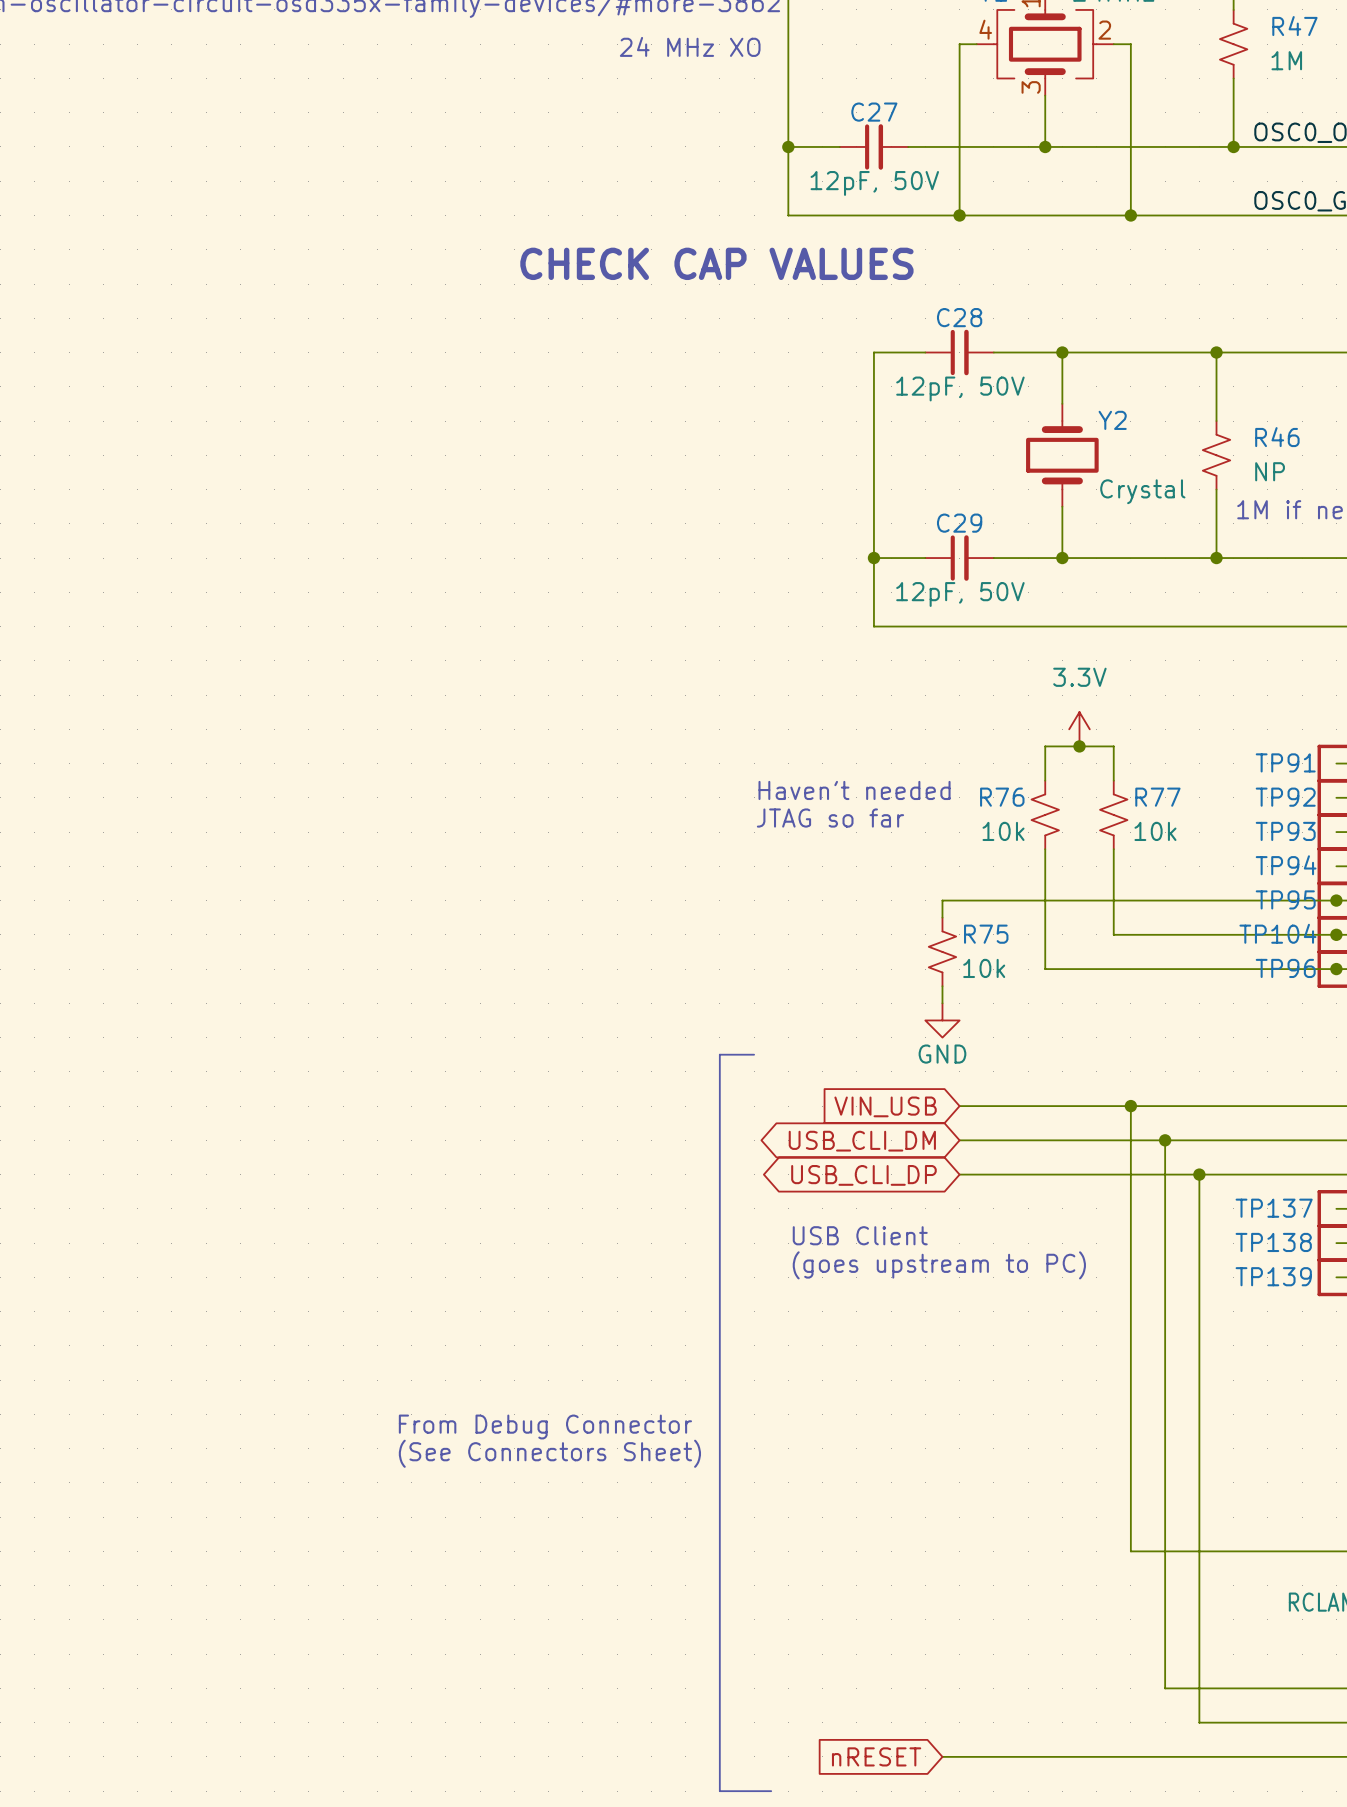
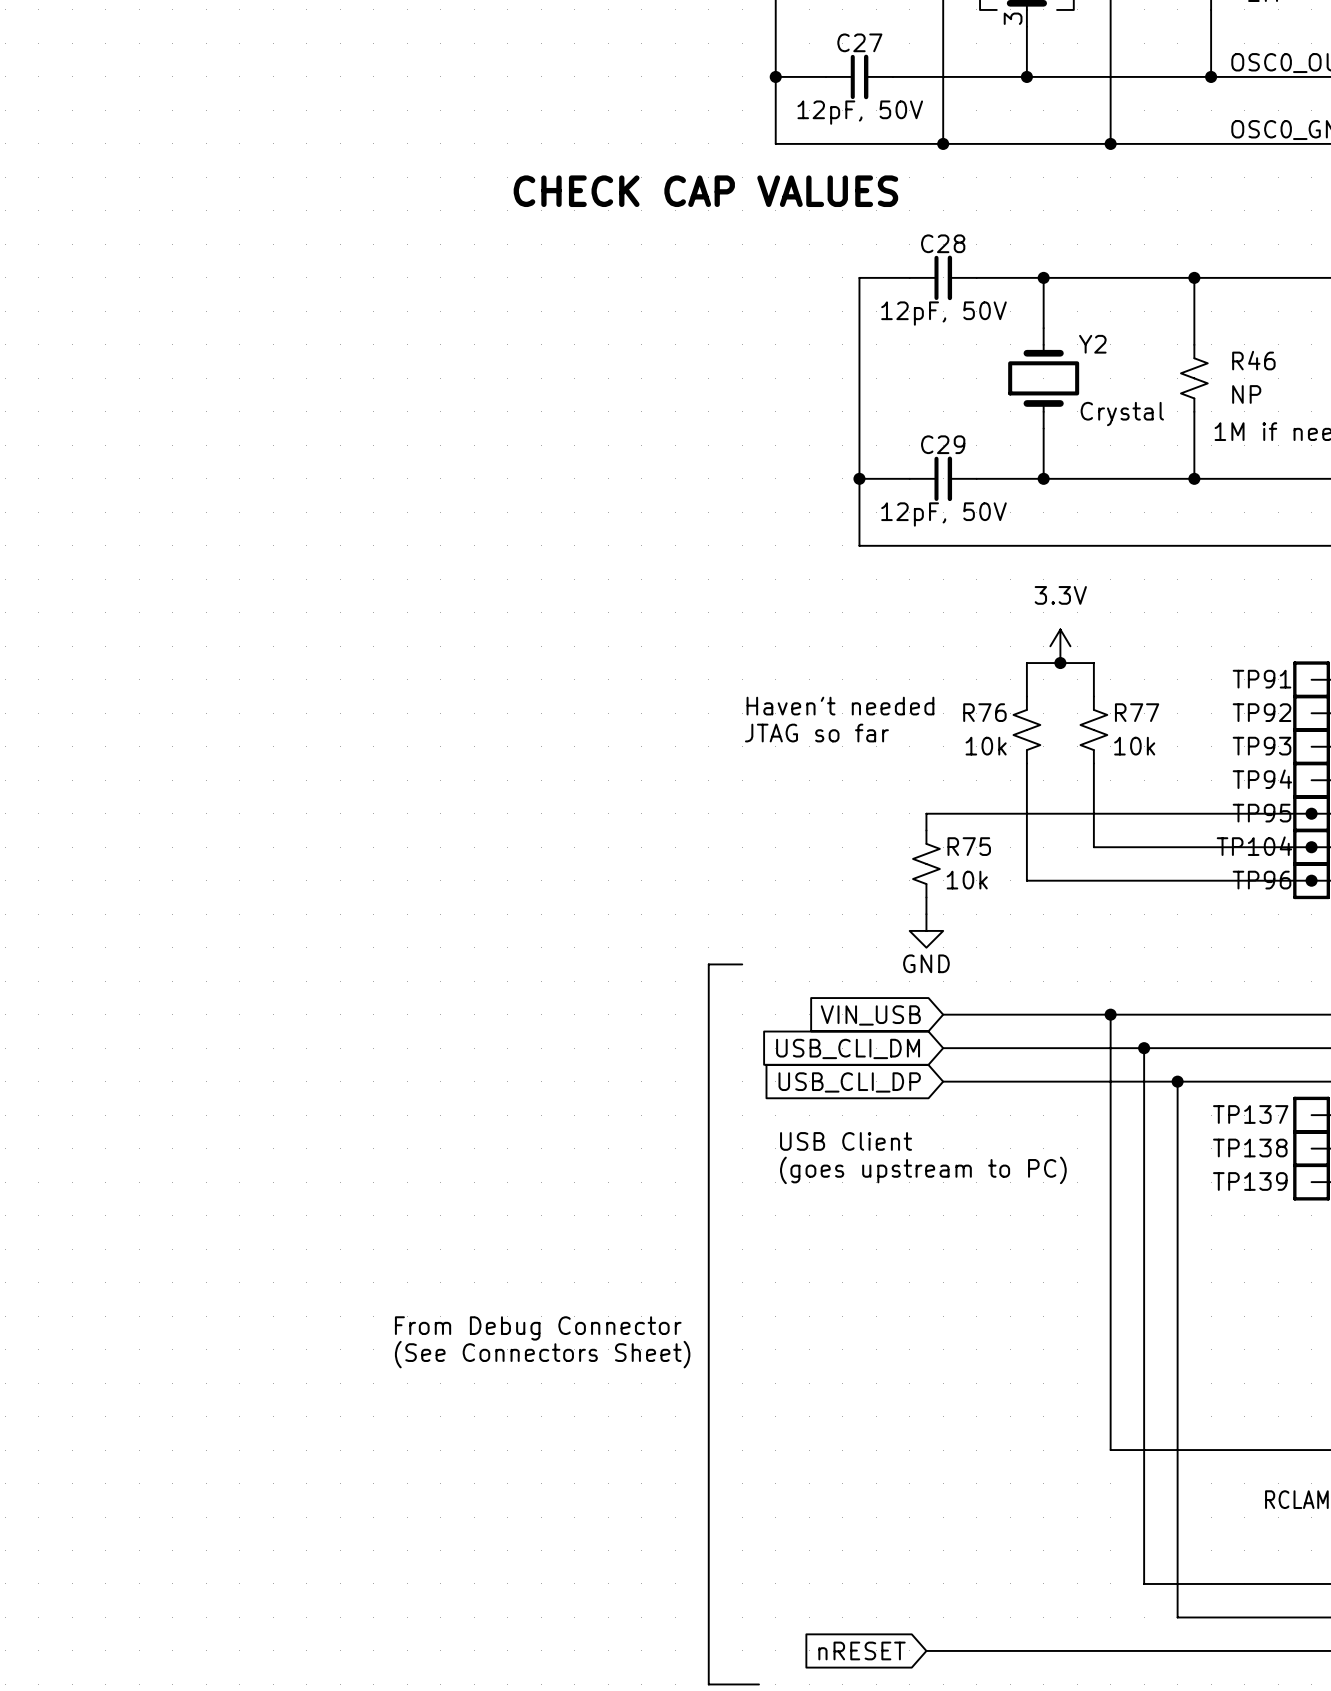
global label shape: bidirectional (862, 1141) -> input (848, 1048)
global label shape: bidirectional (863, 1175) -> input (849, 1082)

